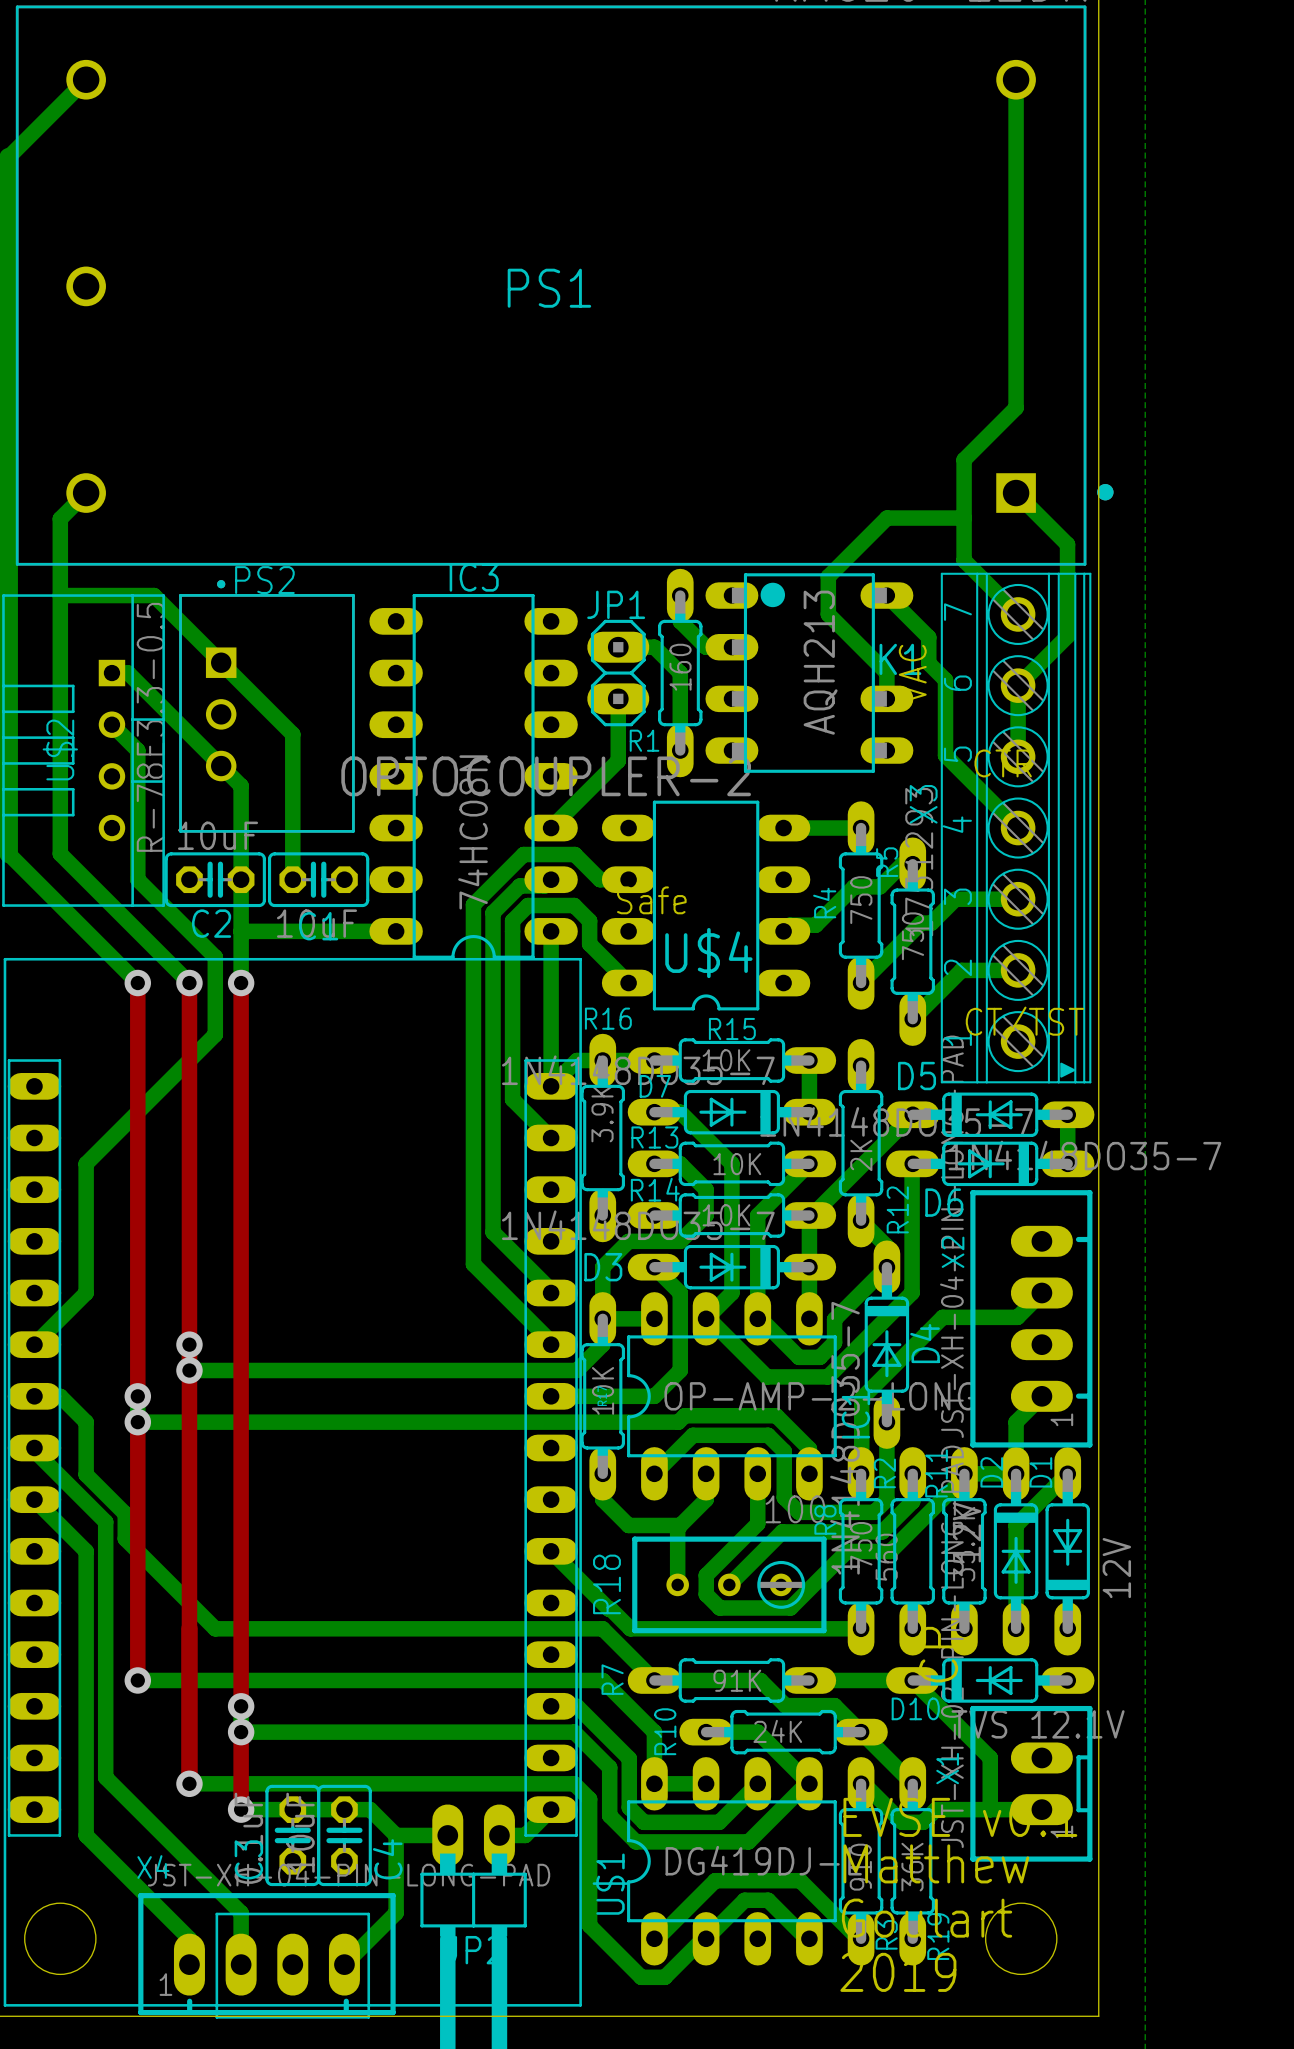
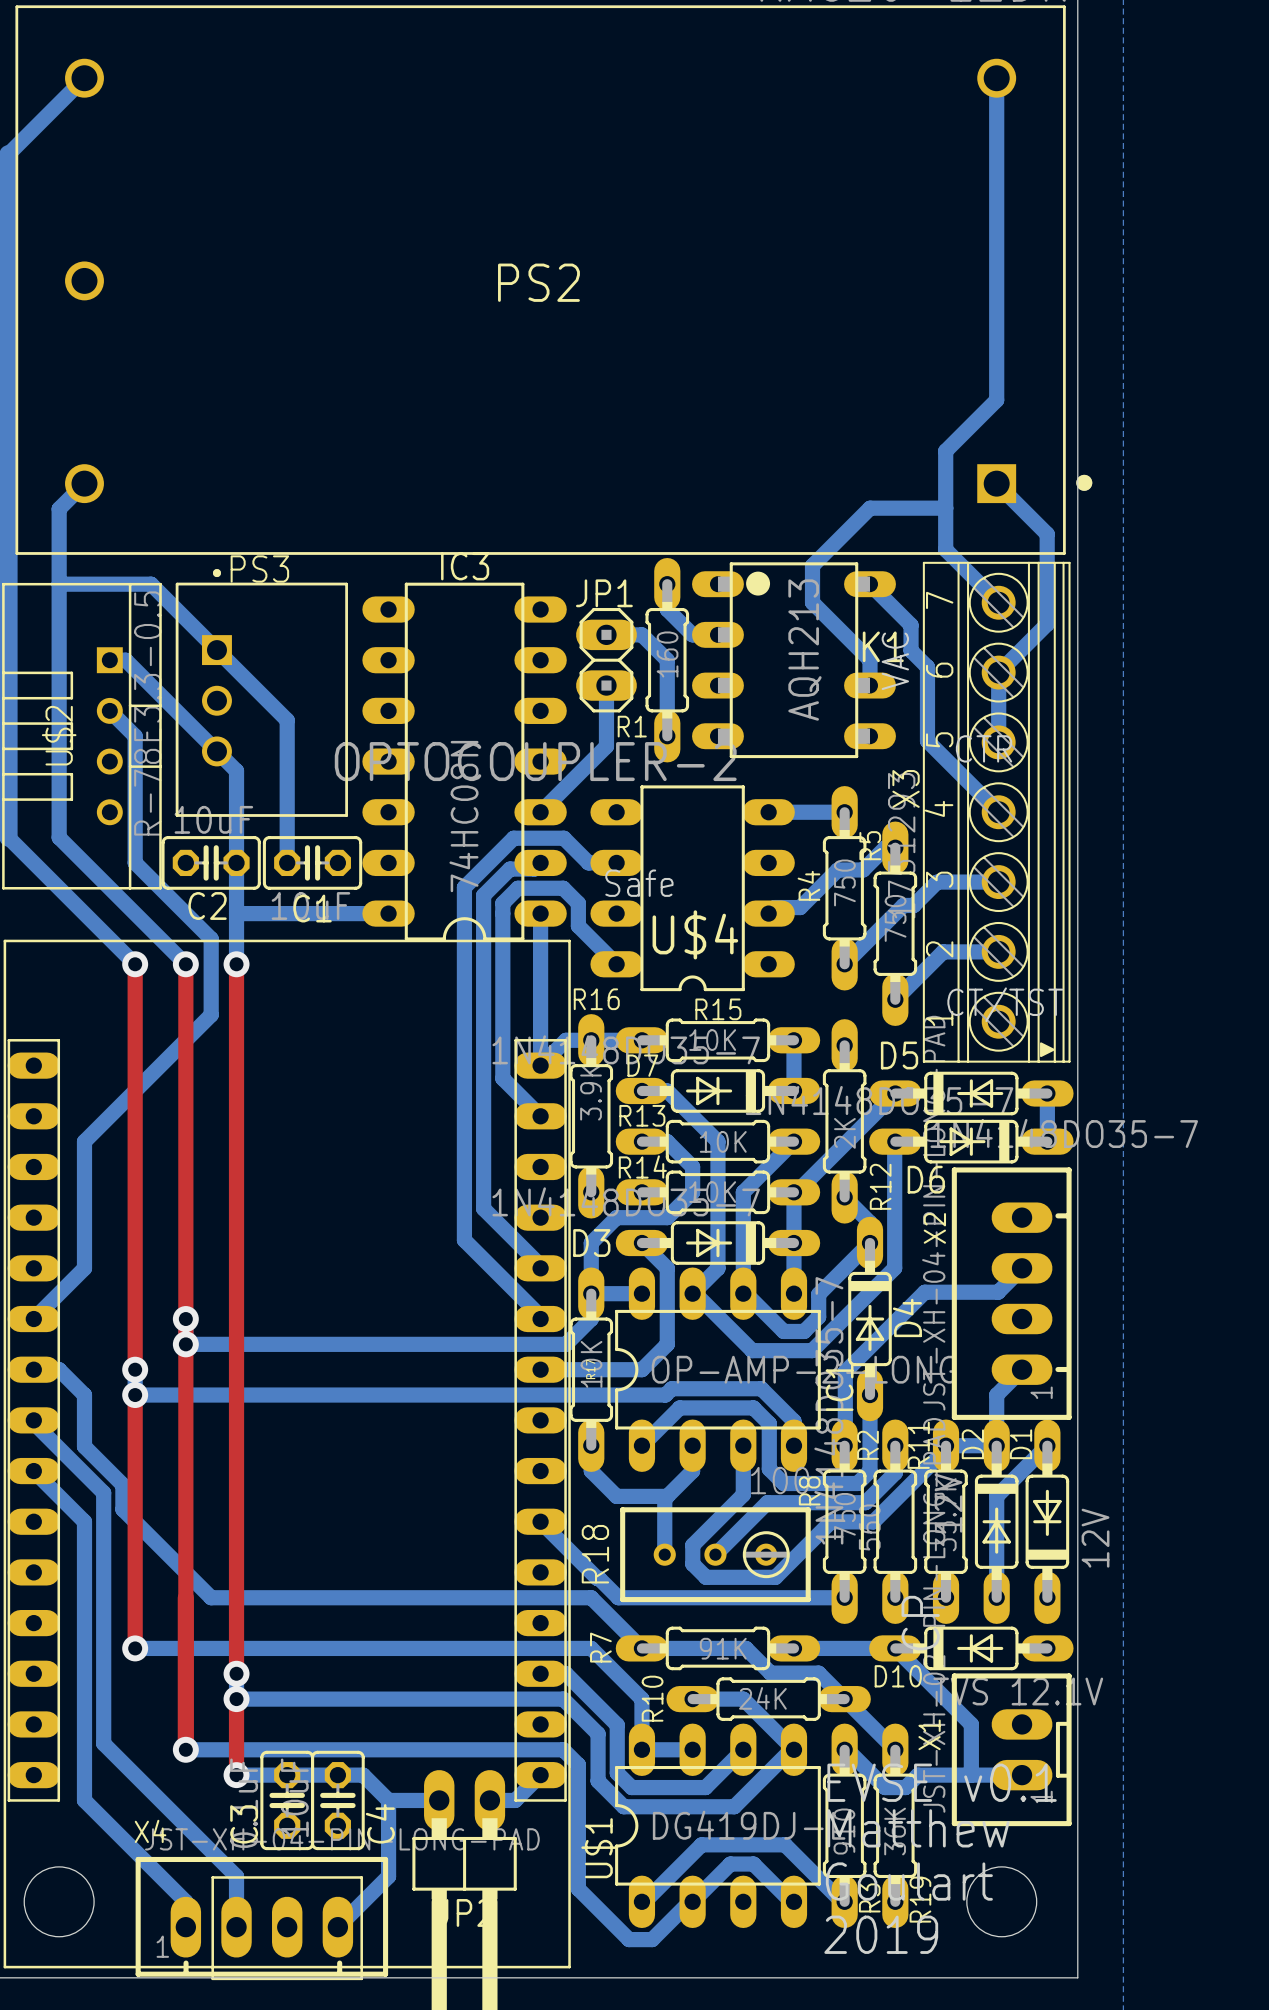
PS1 name: PS1 (549, 288) -> PS2 (538, 282)
PS2 name: PS2 (264, 580) -> PS3 (259, 568)

